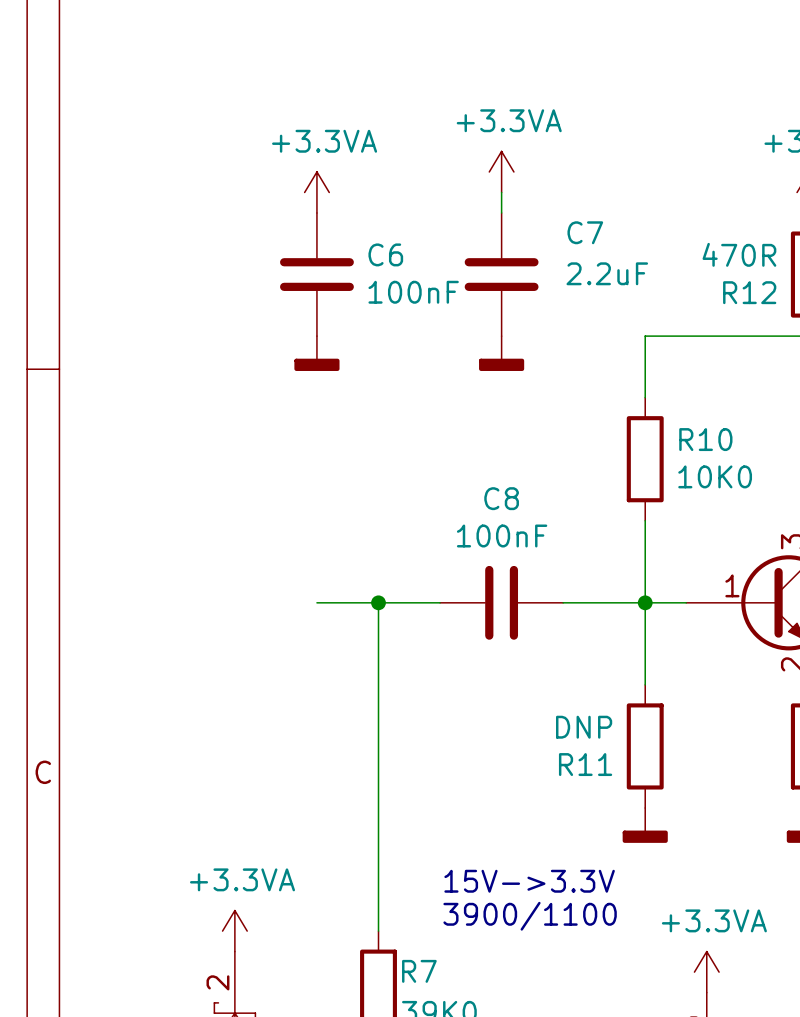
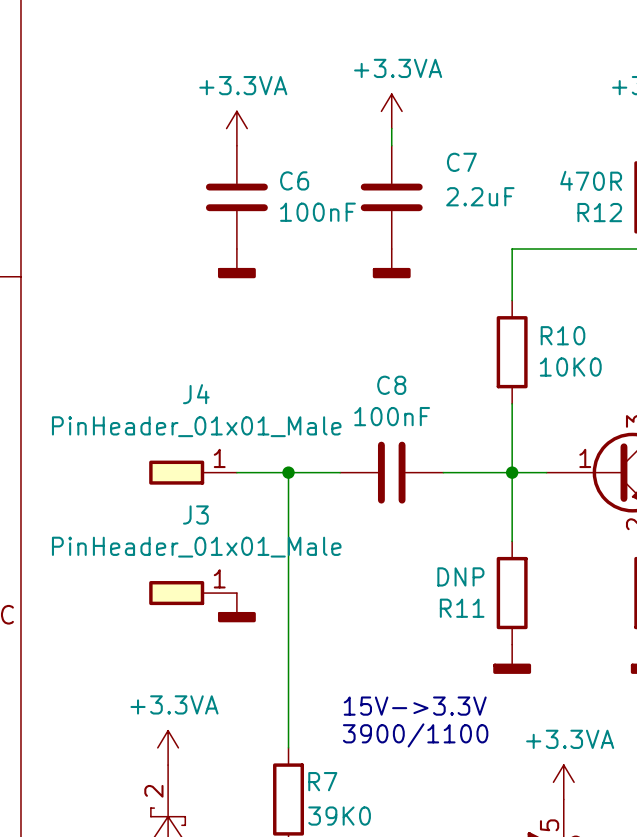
J4: none -> (193, 472)
J3: none -> (193, 593)
power symbol: none -> (236, 607)

